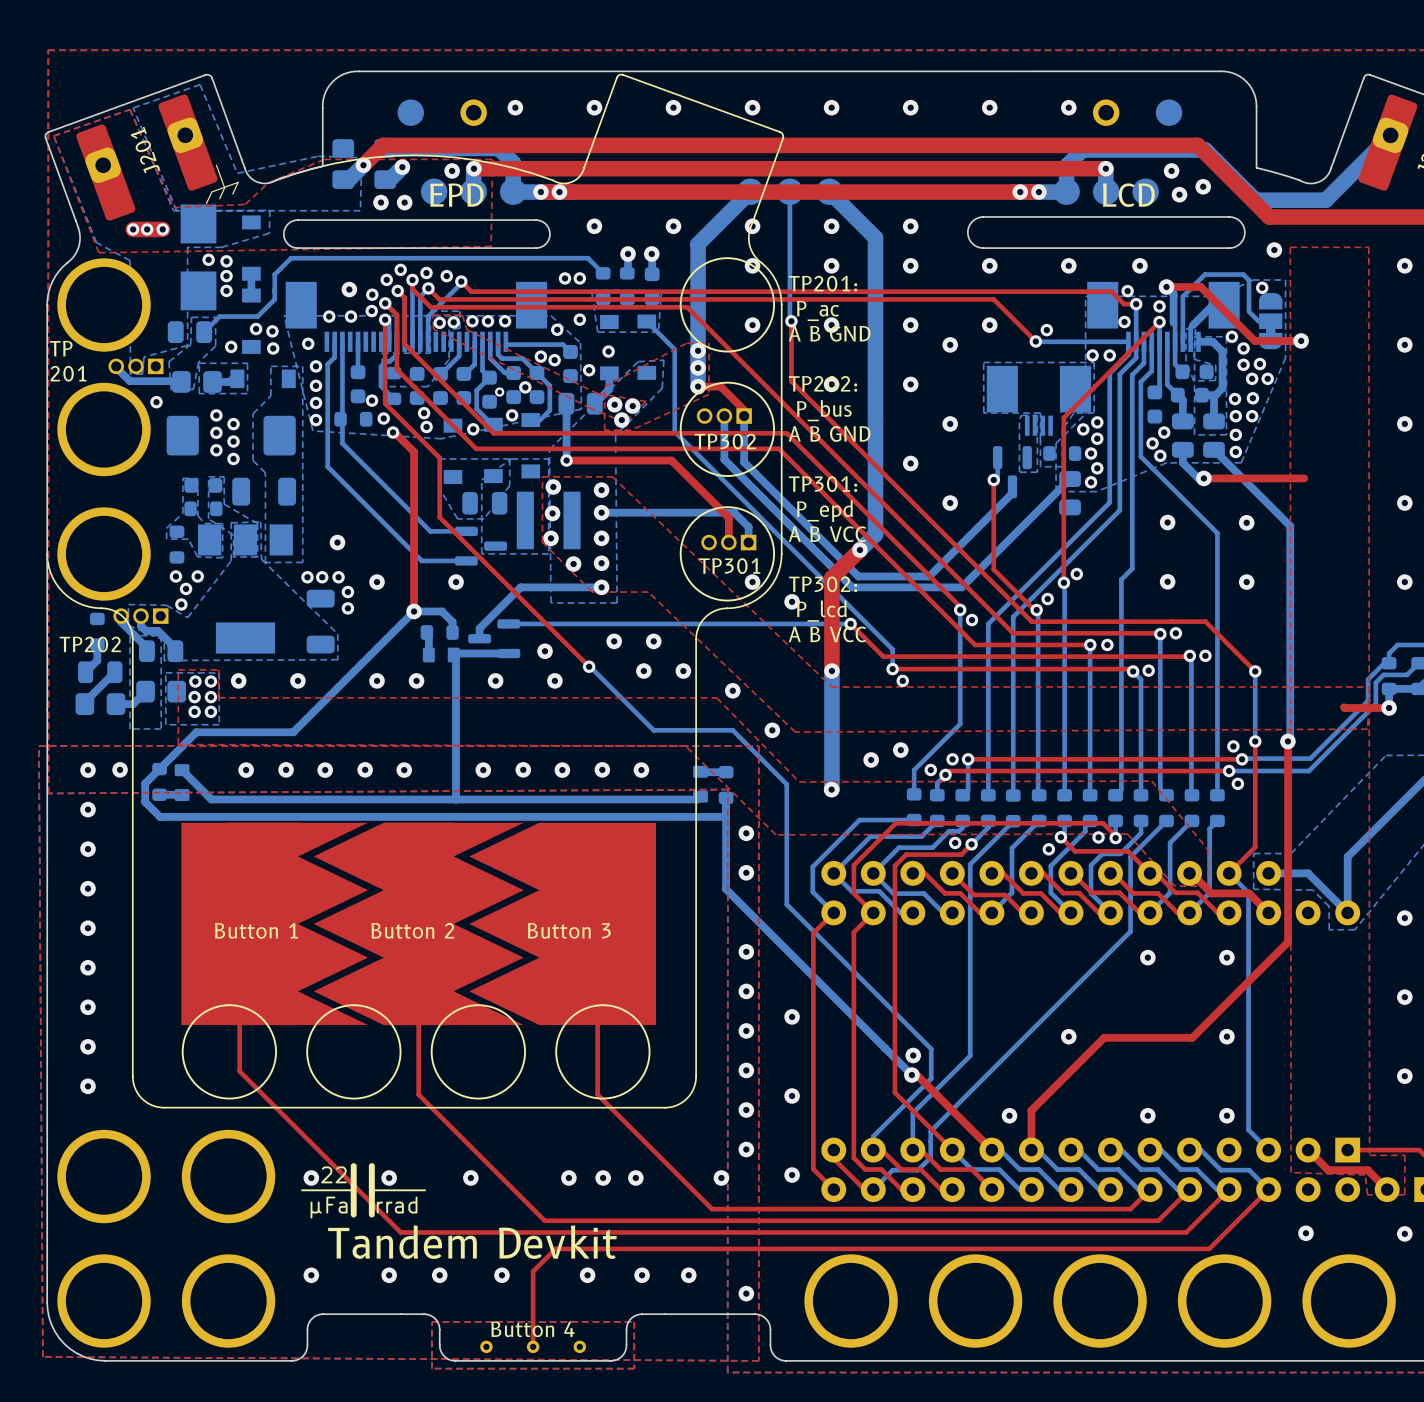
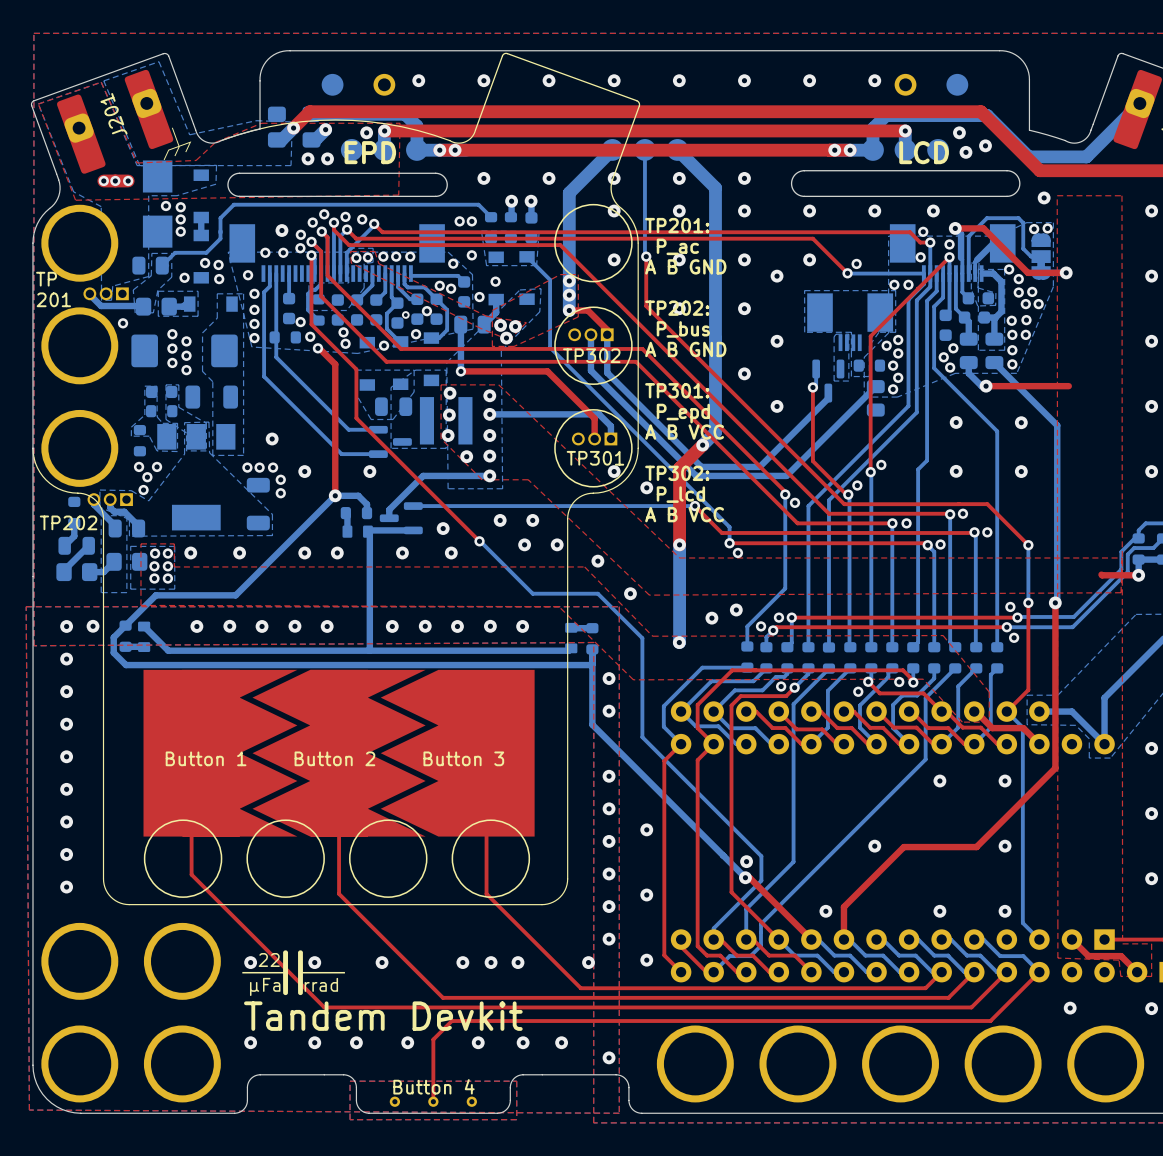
via: none -> (1047, 228)

